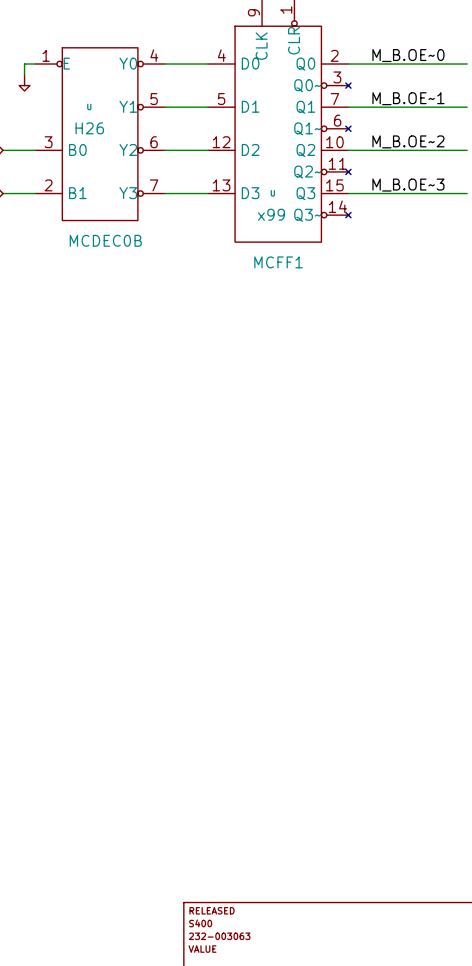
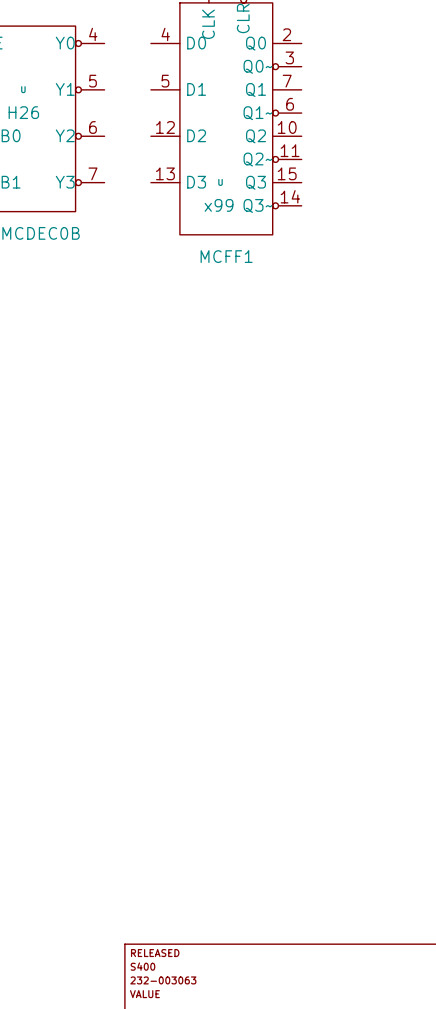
label: M_B.OE~0 (408, 55) -> none
wire: (164, 64) (208, 64) -> none
wire: (348, 64) (467, 64) -> none
no-connect mark: (348, 85) -> none
label: M_B.OE~1 (408, 98) -> none
wire: (164, 107) (208, 107) -> none
wire: (348, 107) (467, 107) -> none
no-connect mark: (348, 128) -> none
label: M_B.OE~2 (408, 141) -> none
wire: (164, 150) (208, 150) -> none
wire: (348, 150) (467, 150) -> none
no-connect mark: (348, 171) -> none
label: M_B.OE~3 (408, 185) -> none
wire: (164, 193) (208, 193) -> none
wire: (348, 193) (467, 193) -> none
no-connect mark: (348, 215) -> none

